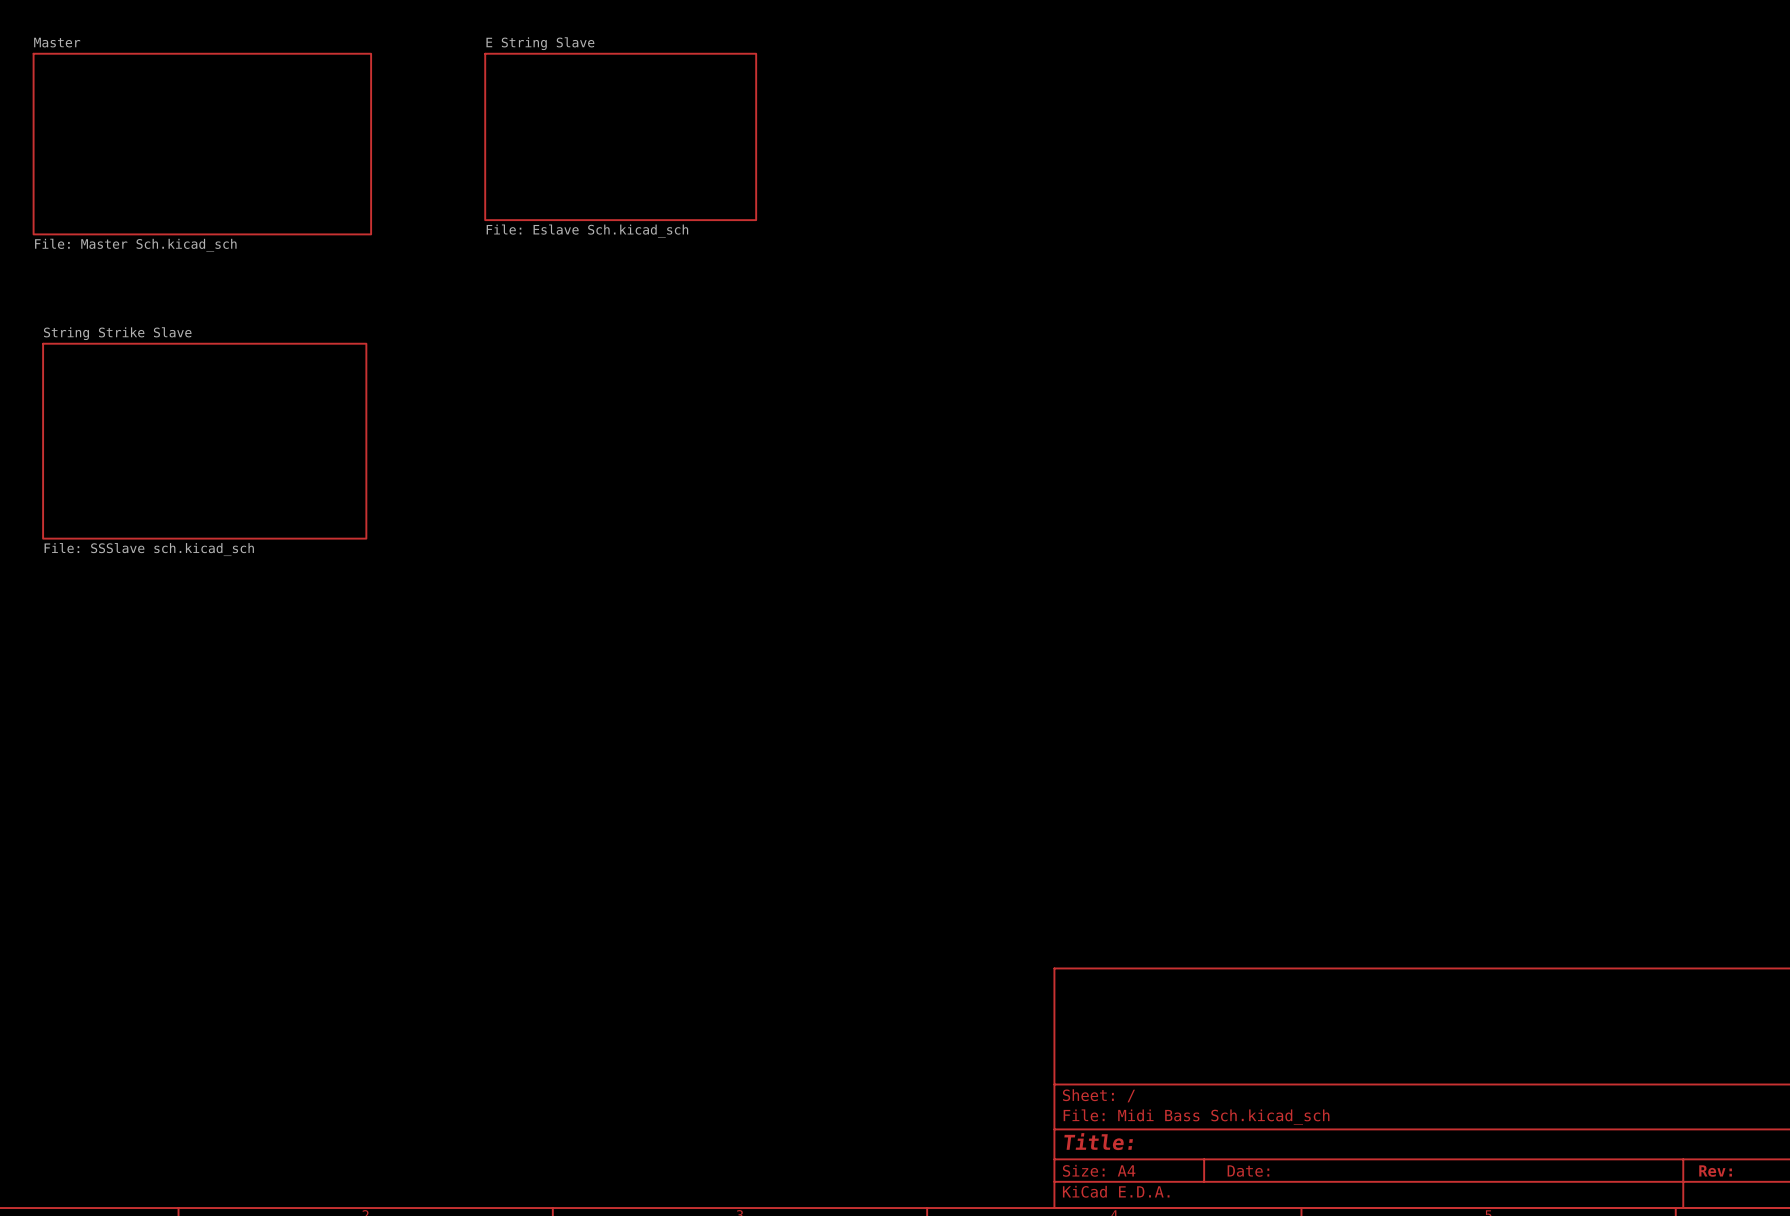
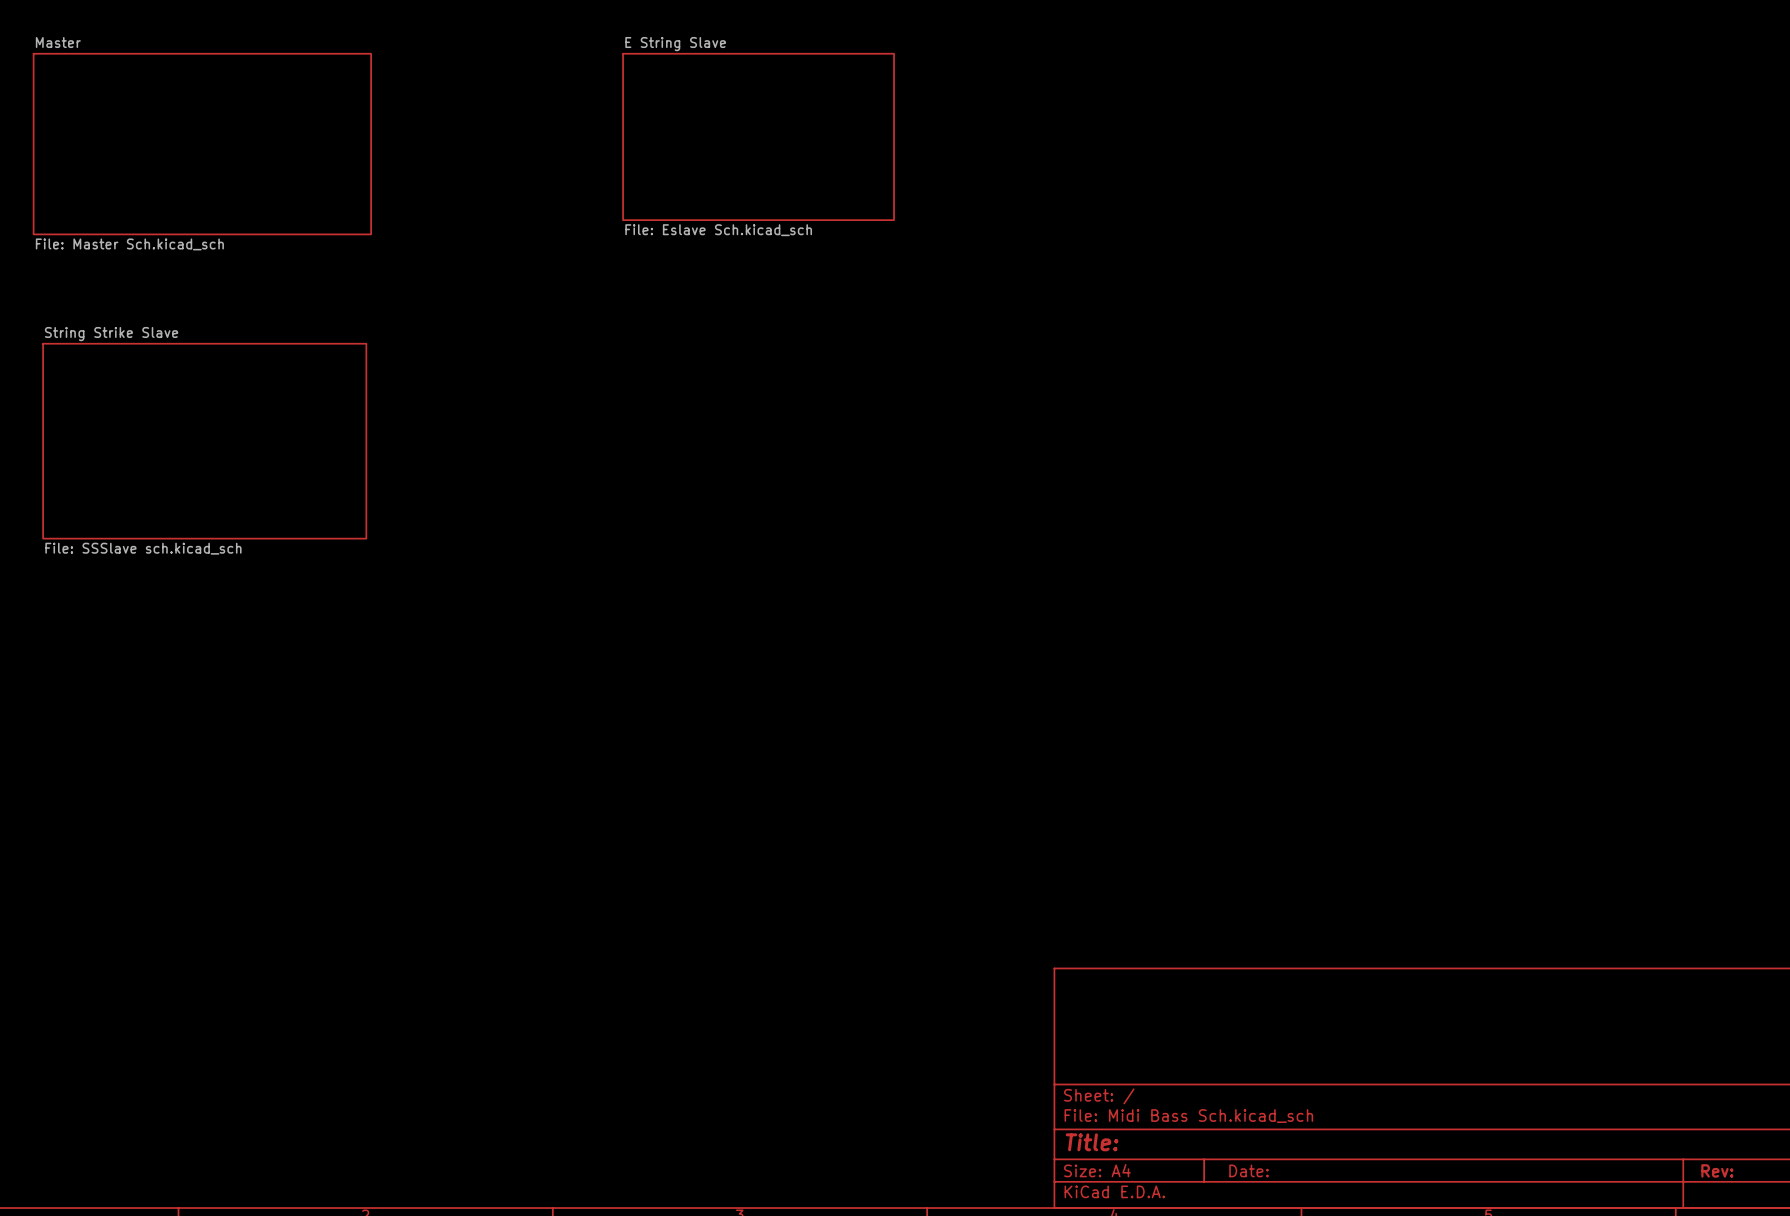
sheet E String Slave position: (620, 136) -> (758, 136)

